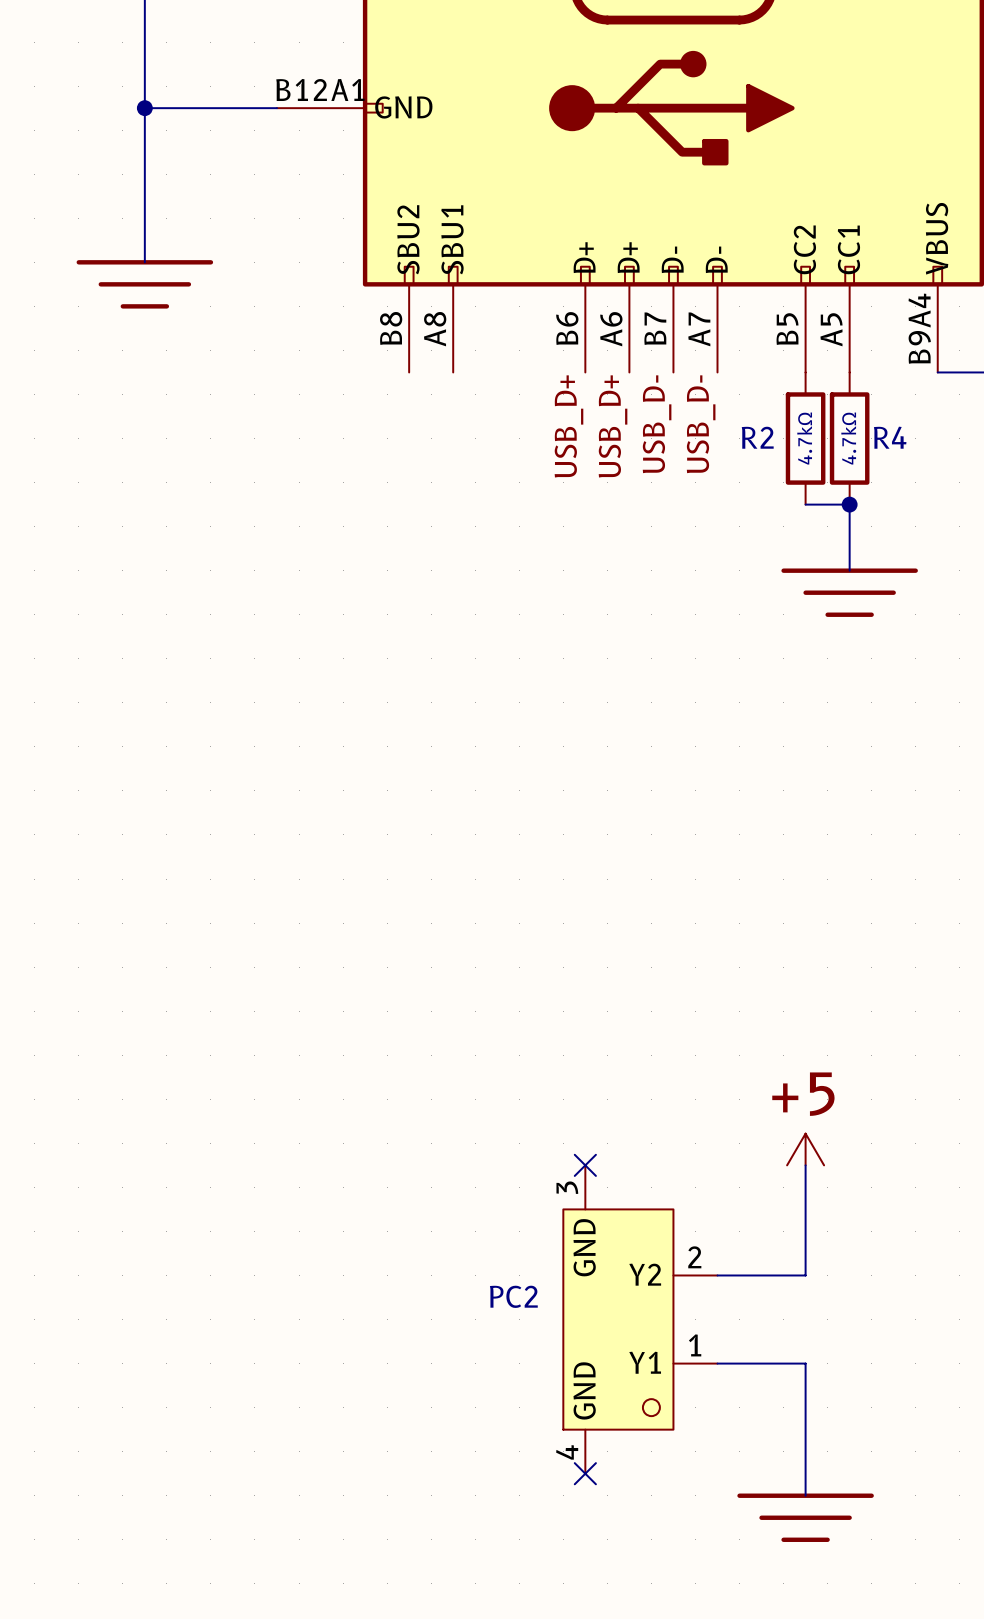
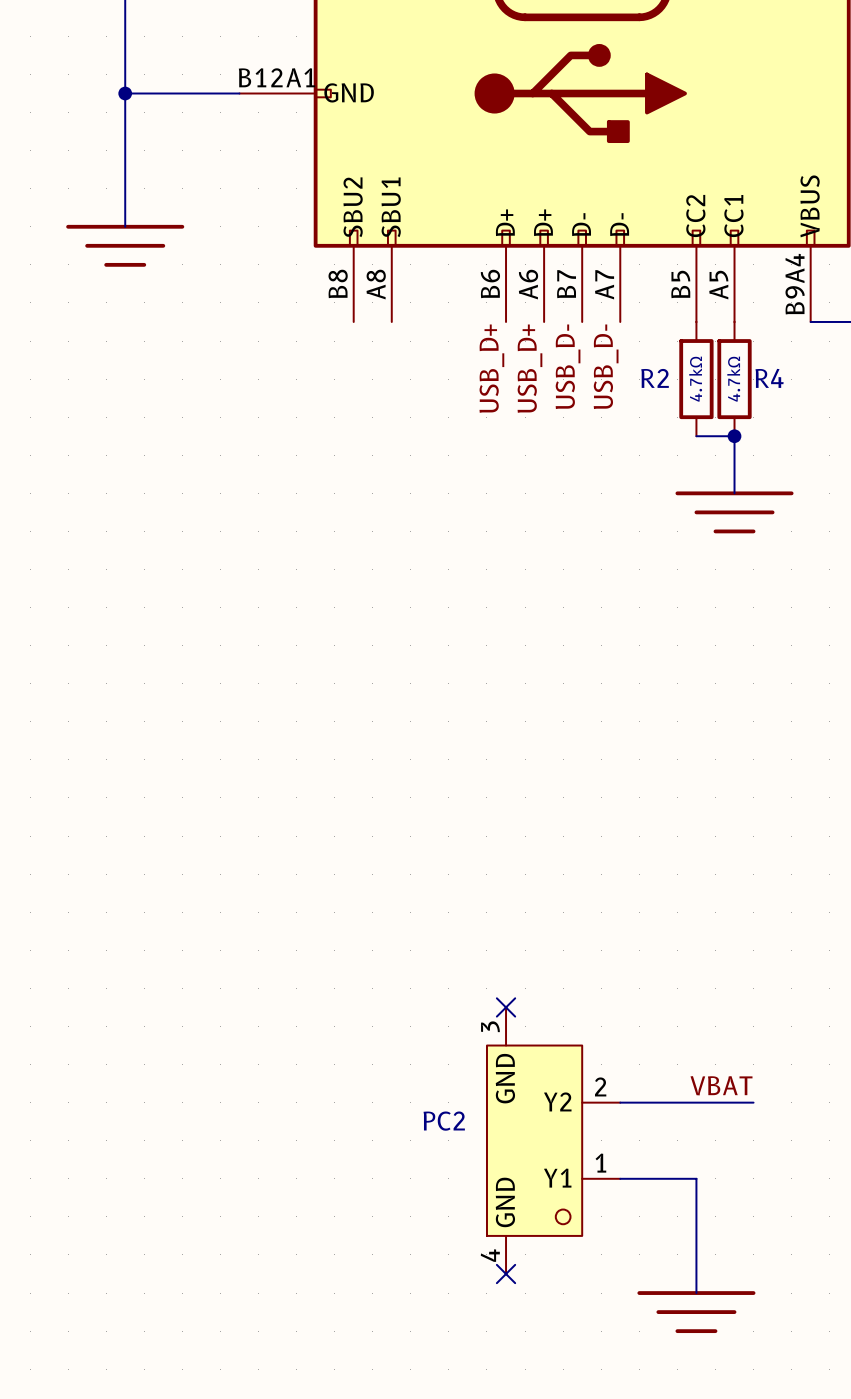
power symbol: (805, 1149) -> none
wire: (805, 1165) (805, 1275) -> (753, 1102) (696, 1102)
label: none -> VBAT (721, 1085)

